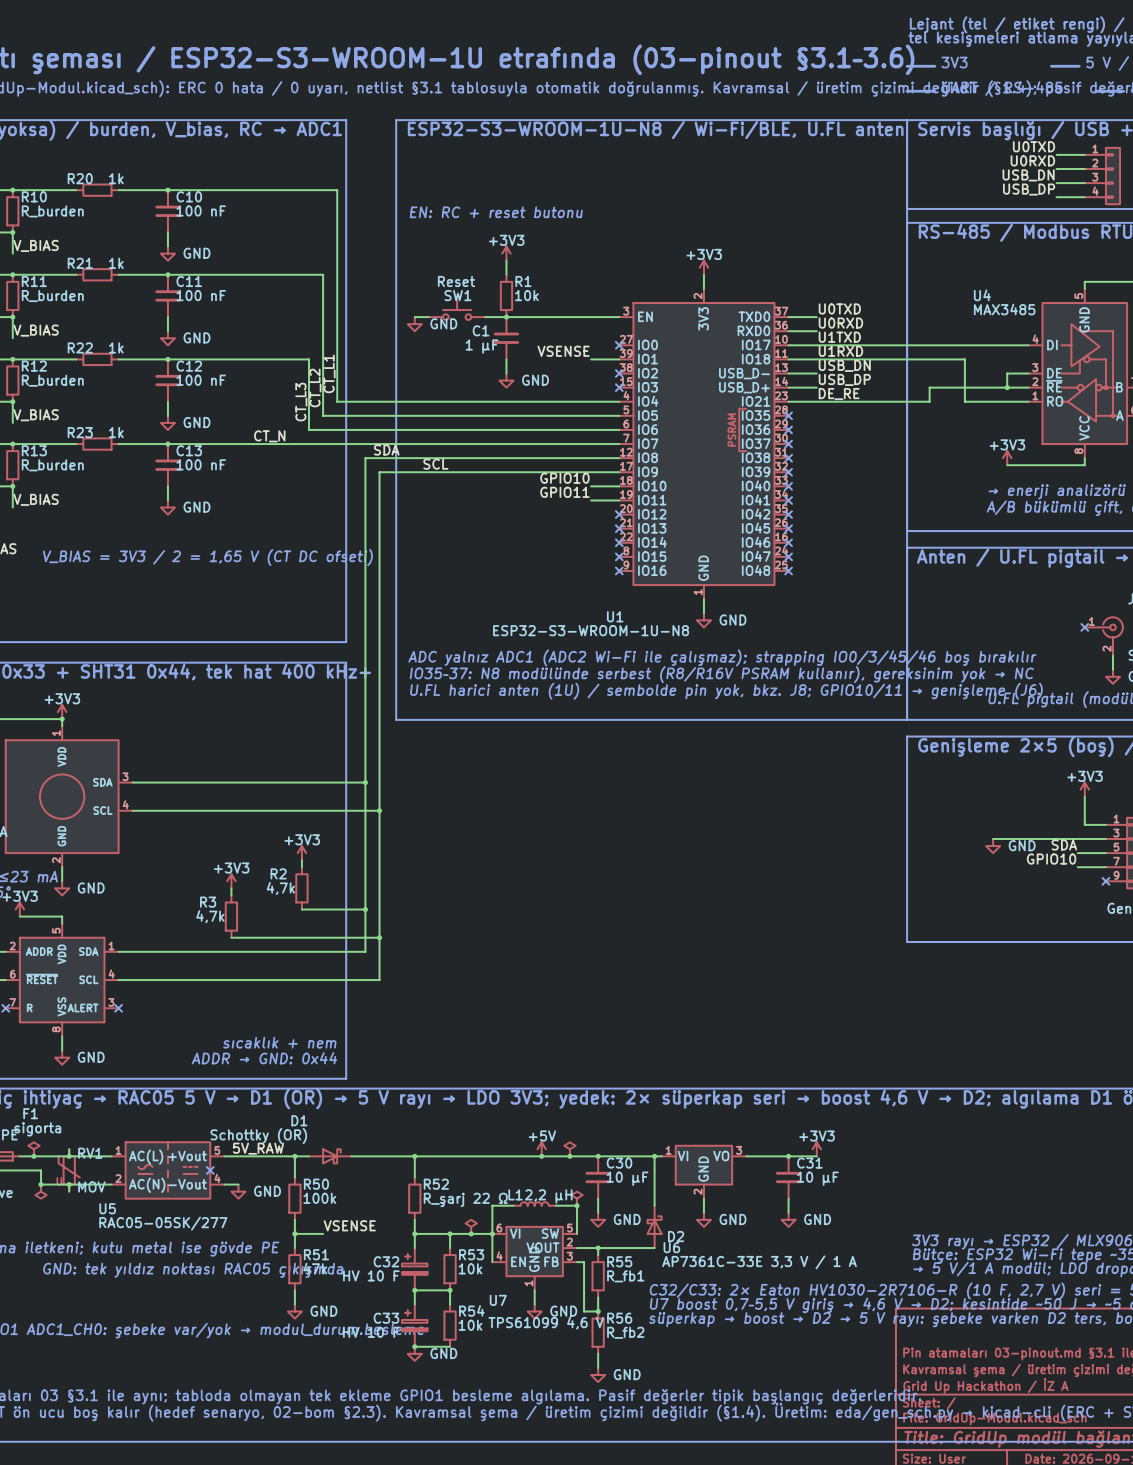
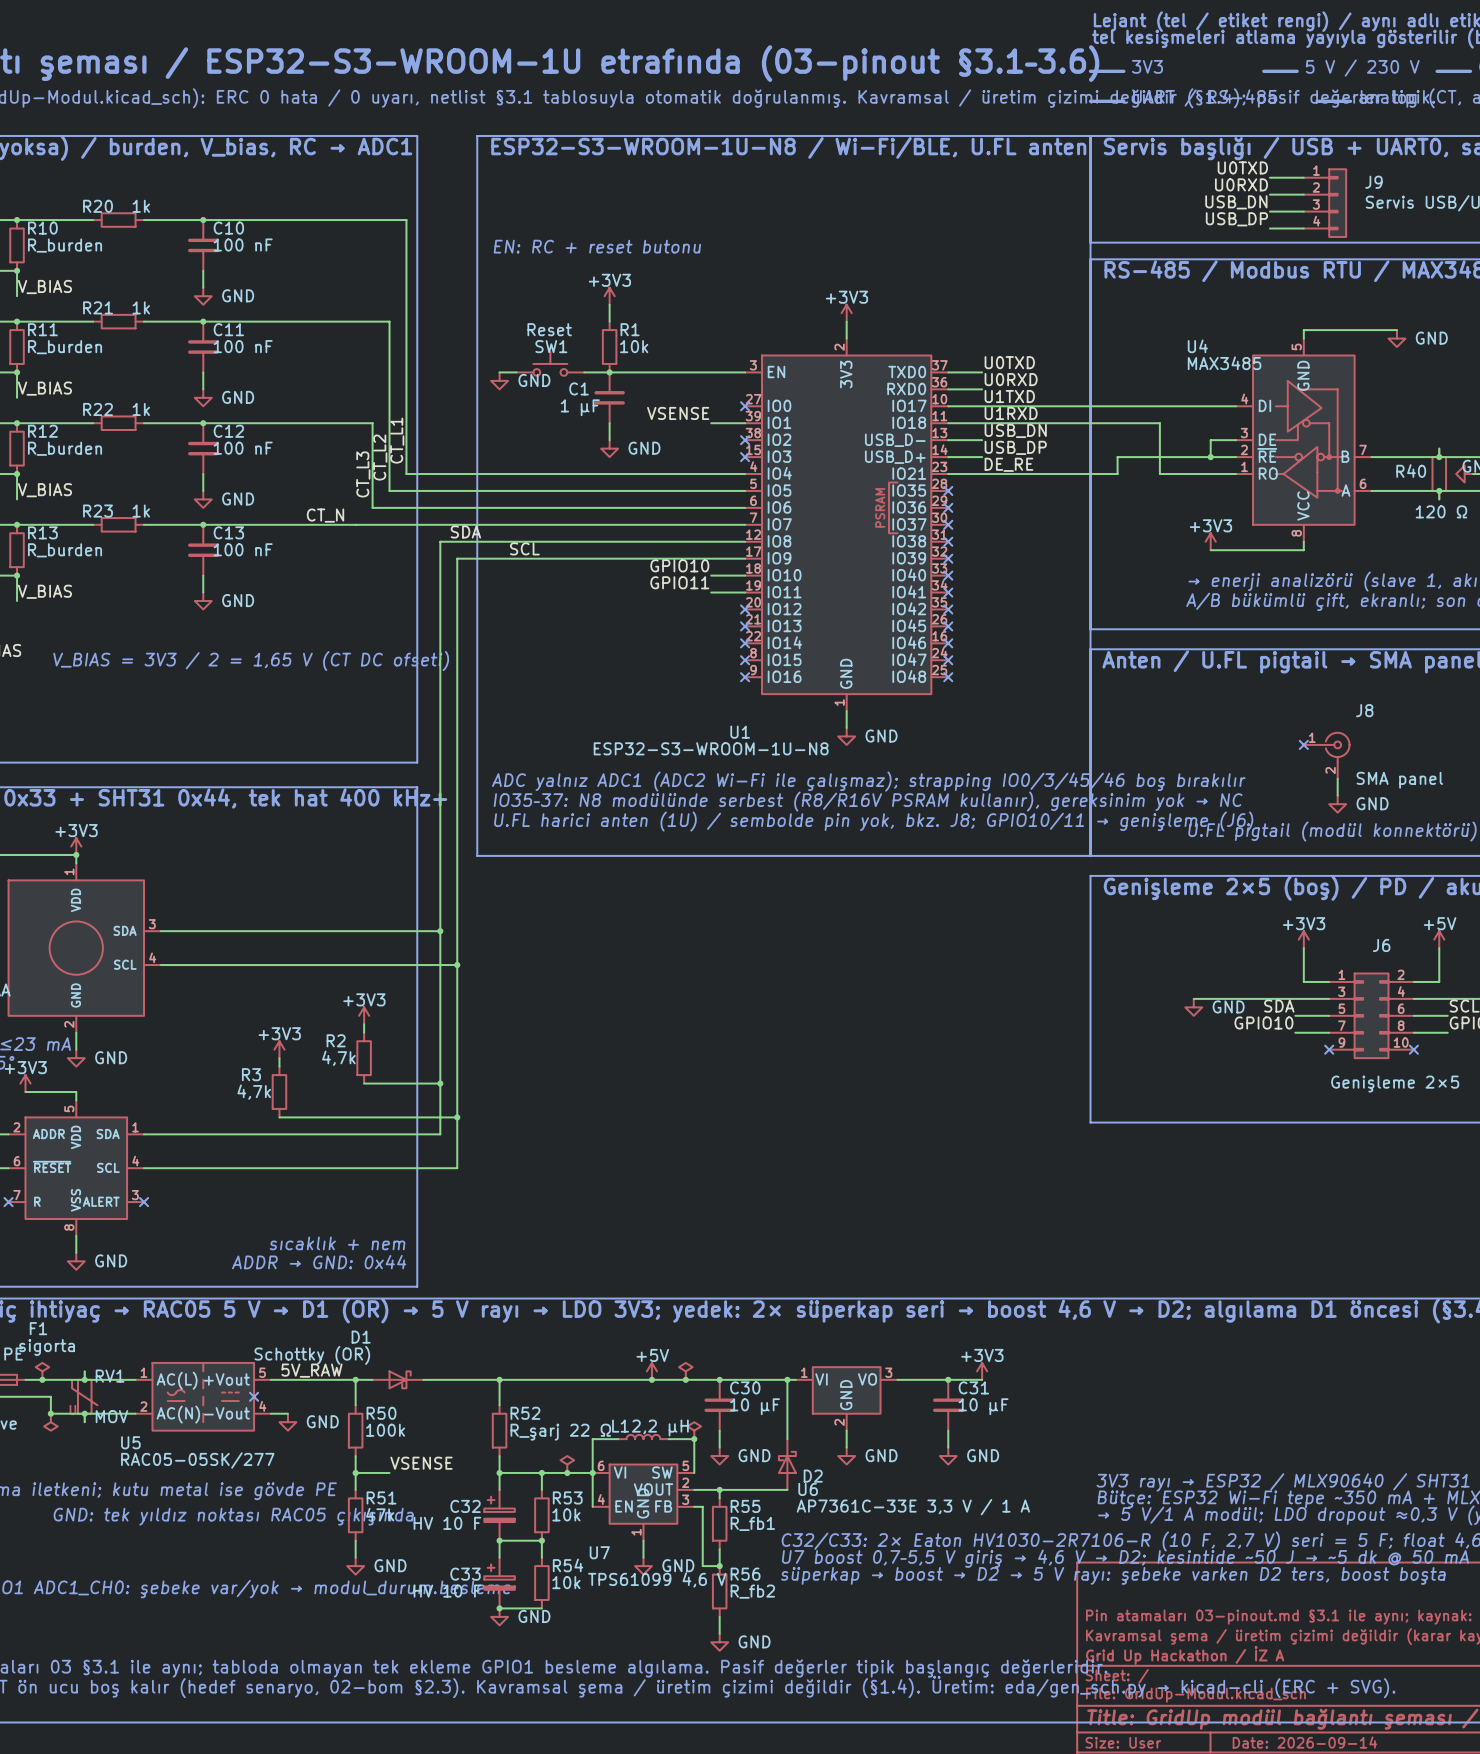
U4 name position: U4 (982, 295) -> U4 (1197, 346)
U4 value position: MAX3485 (1004, 309) -> MAX3485 (1224, 363)

